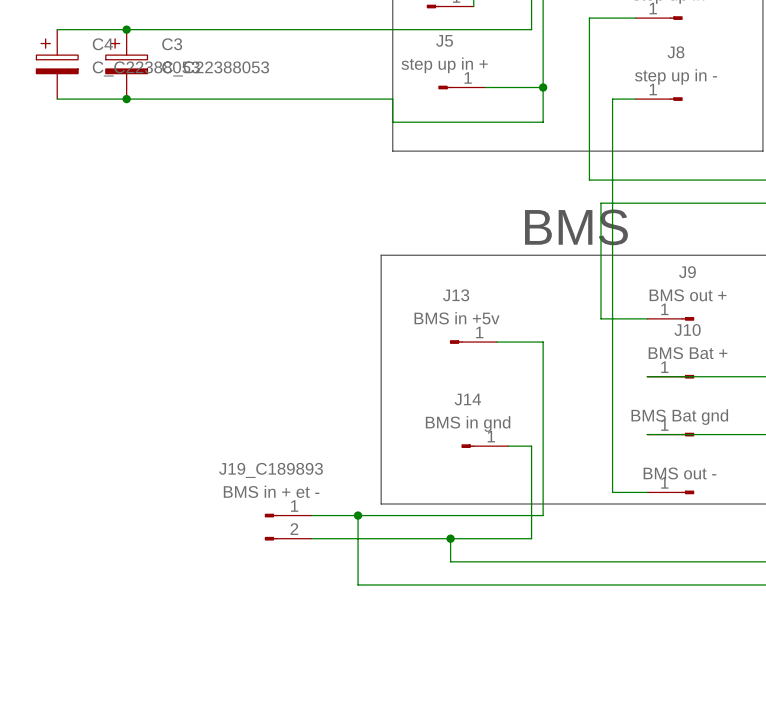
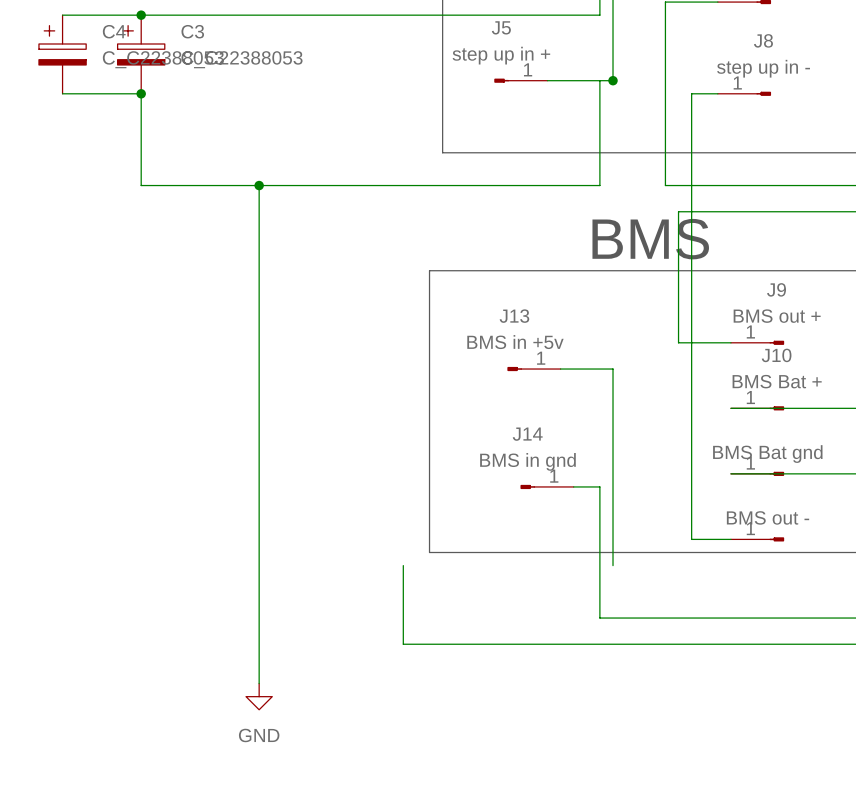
wire: (543, 87) (543, 122) (392, 122) (392, 99) (126, 99) -> (599, 80) (599, 185) (141, 185) (141, 93)
wire: none -> (259, 185) (259, 683)
junction: none -> (259, 185)
wire: (311, 515) (543, 515) -> none
junction: (358, 515) -> none
J19_C189893: BMS in + et - (288, 527) -> none
wire: (311, 538) (531, 538) -> none
wire: (450, 538) (450, 561) (531, 561) -> (599, 591) (599, 618)
junction: (450, 538) -> none
power symbol: none -> GND (259, 696)

